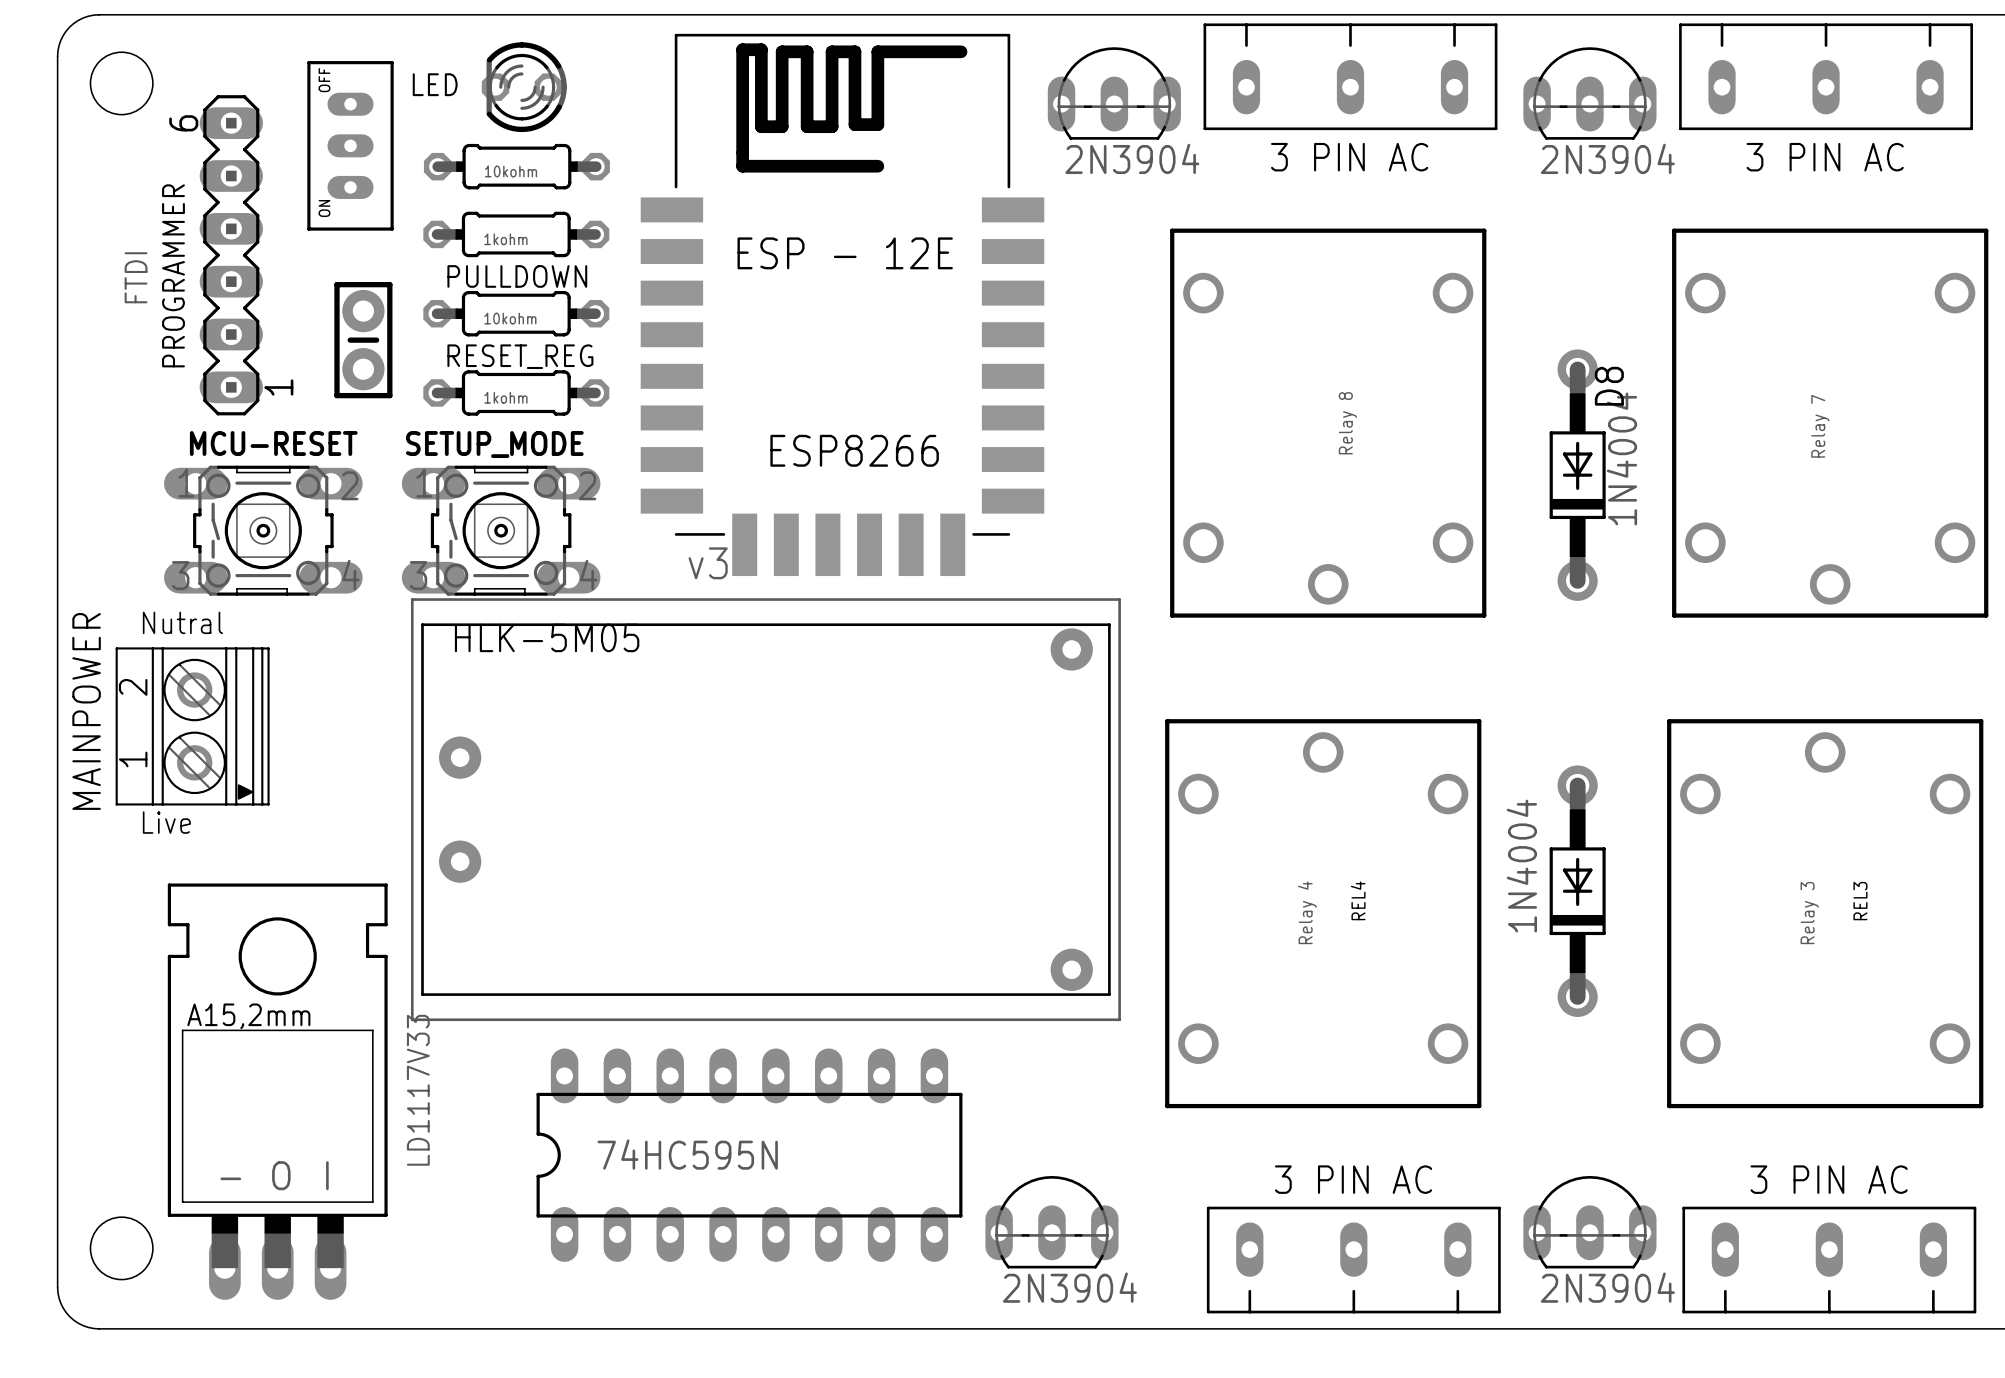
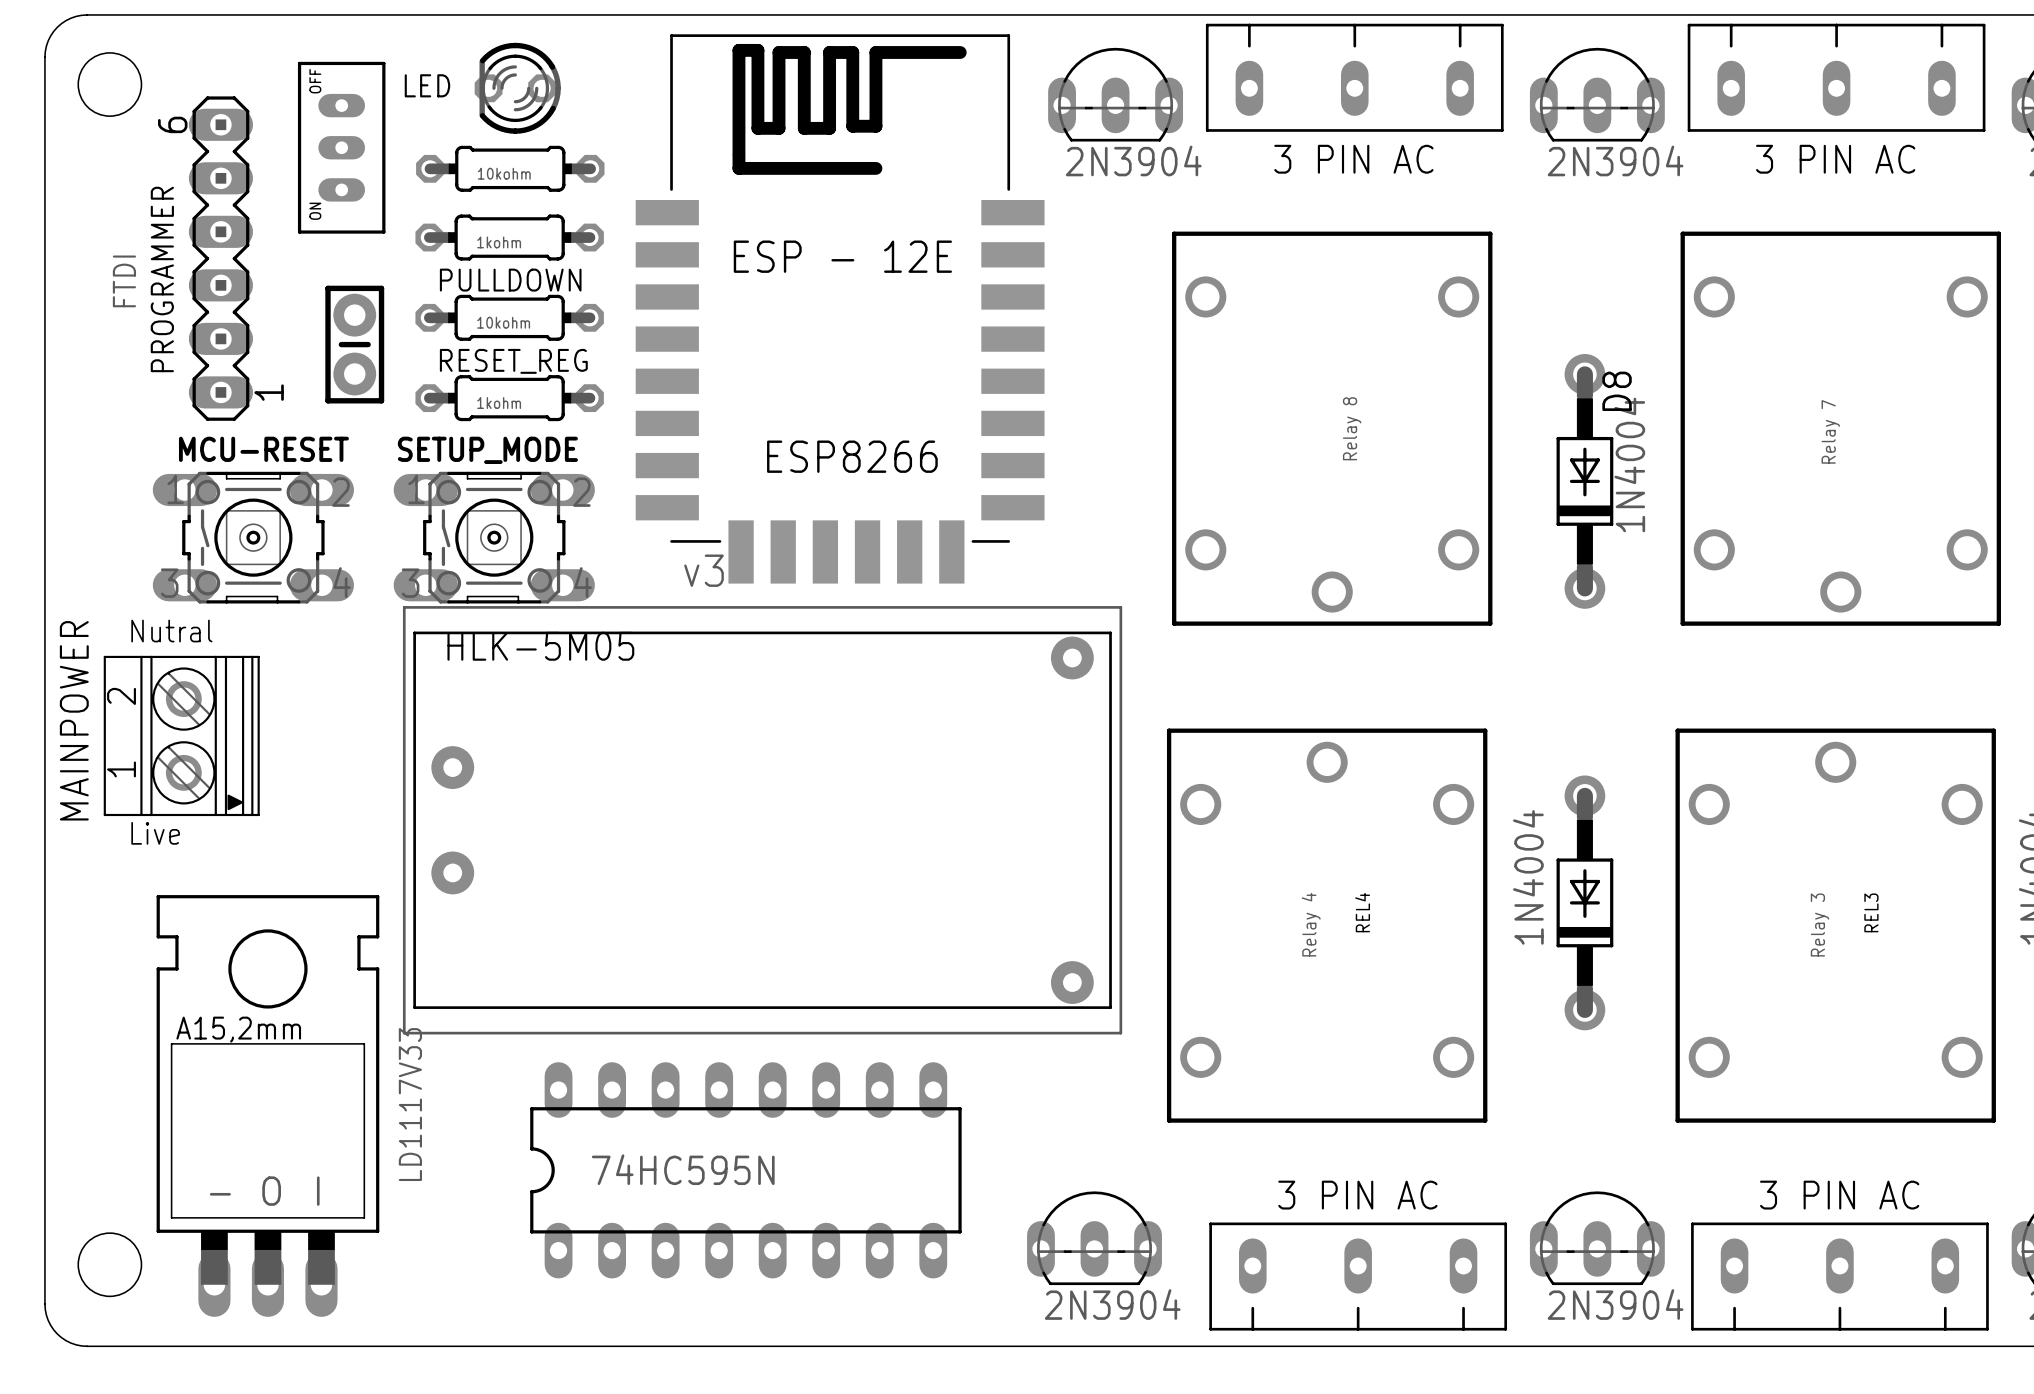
part position: (1051, 1222) -> (1094, 1238)

